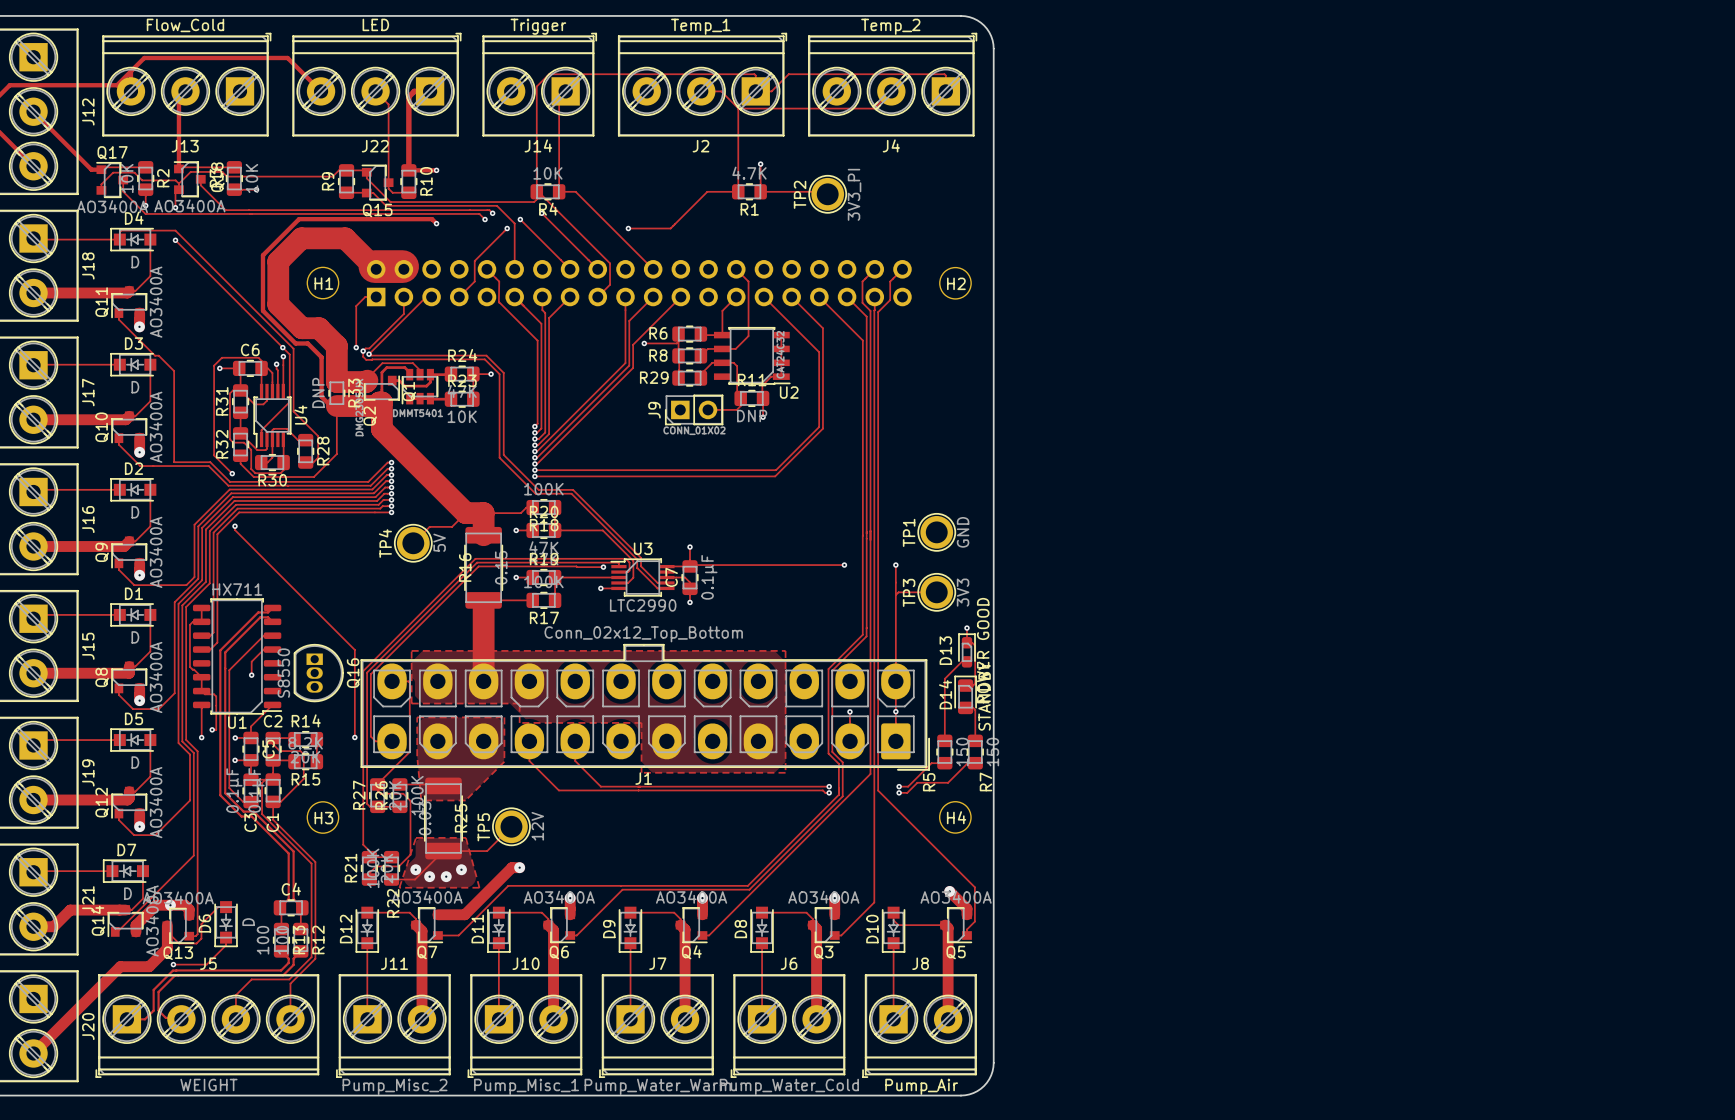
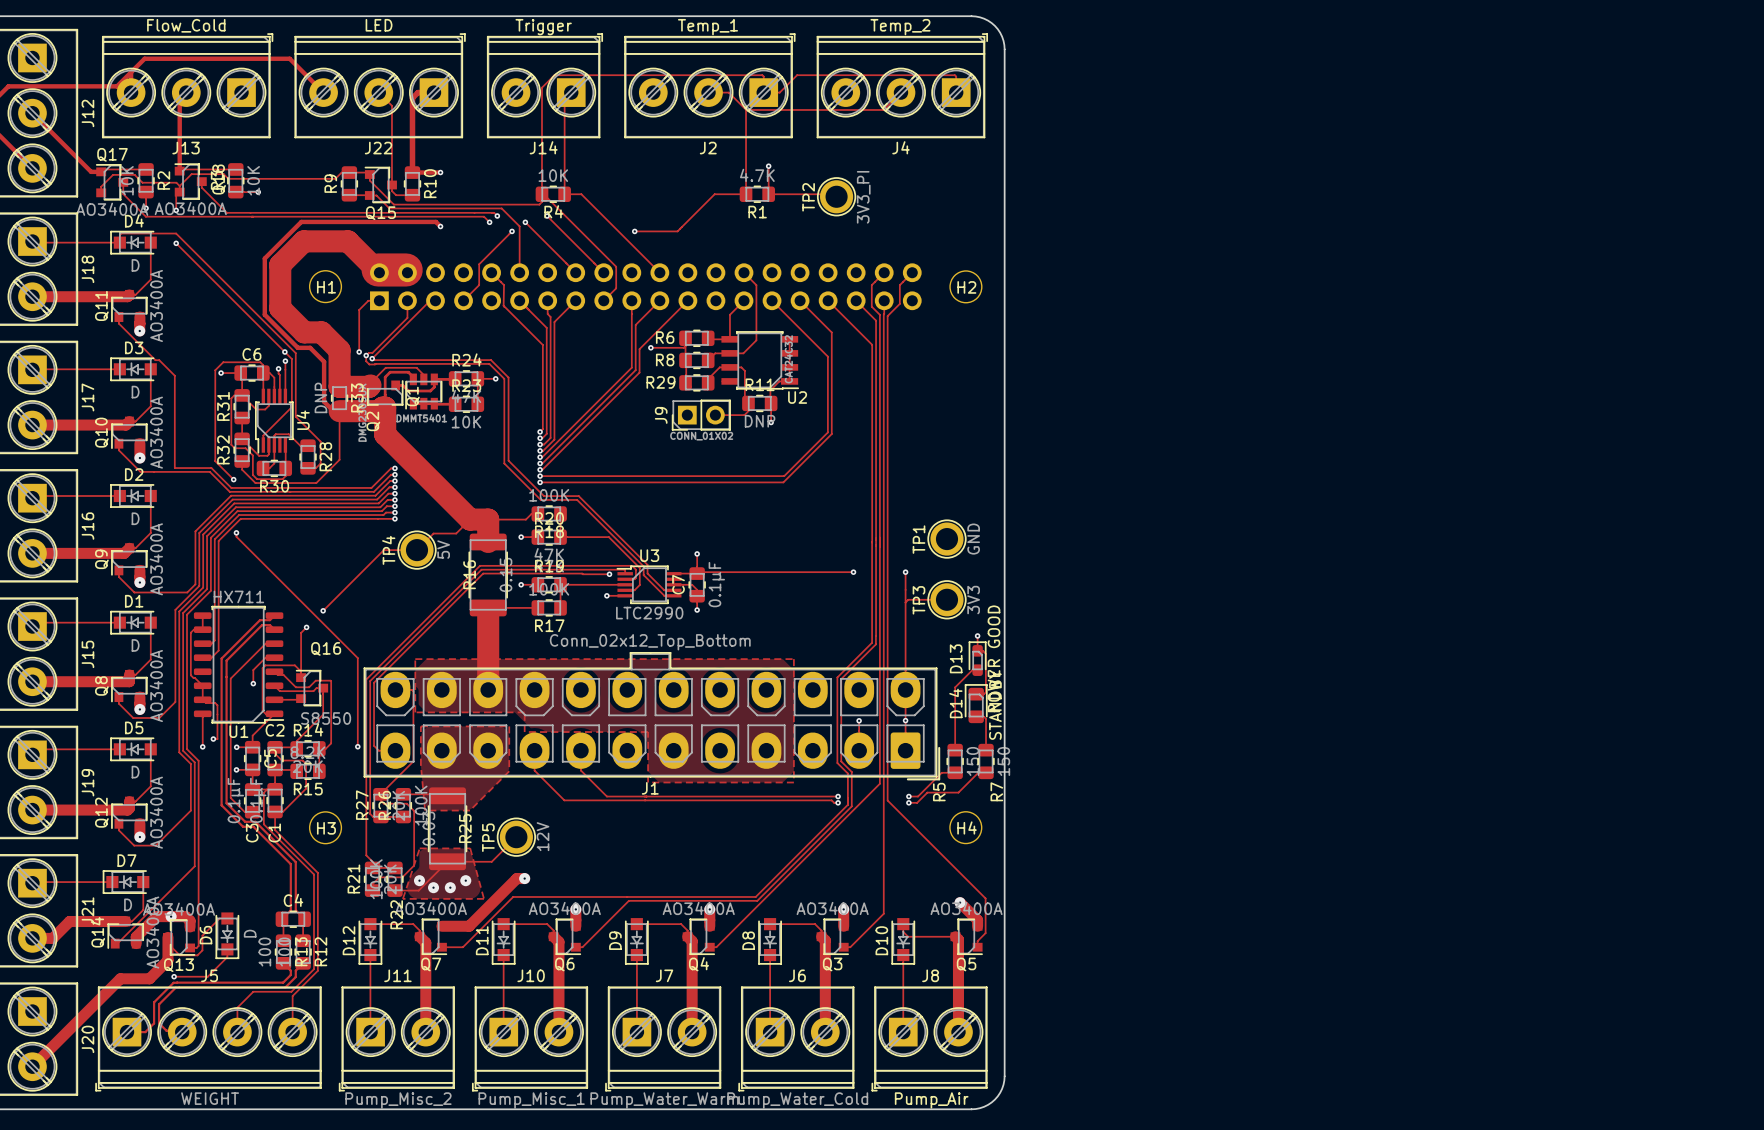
track: none -> (417, 550) (383, 550) (323, 610)
via: none -> (323, 610)
track: none -> (306, 627) (301, 632) (301, 677)
via: none -> (306, 627)
Q16 footprint: [293, 644, 344, 703] -> [295, 670, 329, 707]
track: none -> (274, 671) (277, 675) (283, 675) (295, 687) (309, 687) (315, 680) (331, 681) (331, 743) (325, 748) (319, 748)
track: none -> (301, 671) (294, 665) (265, 665) (262, 668) (262, 710) (265, 713) (274, 713)
Q16 value position: S8550 (283, 673) -> S8550 (326, 718)
Q16 name position: Q16 (353, 673) -> Q16 (326, 648)
track: none -> (274, 685) (279, 691) (313, 691) (316, 688) (323, 688) (323, 714) (296, 741) (296, 748)
track: none -> (301, 698) (274, 699)

